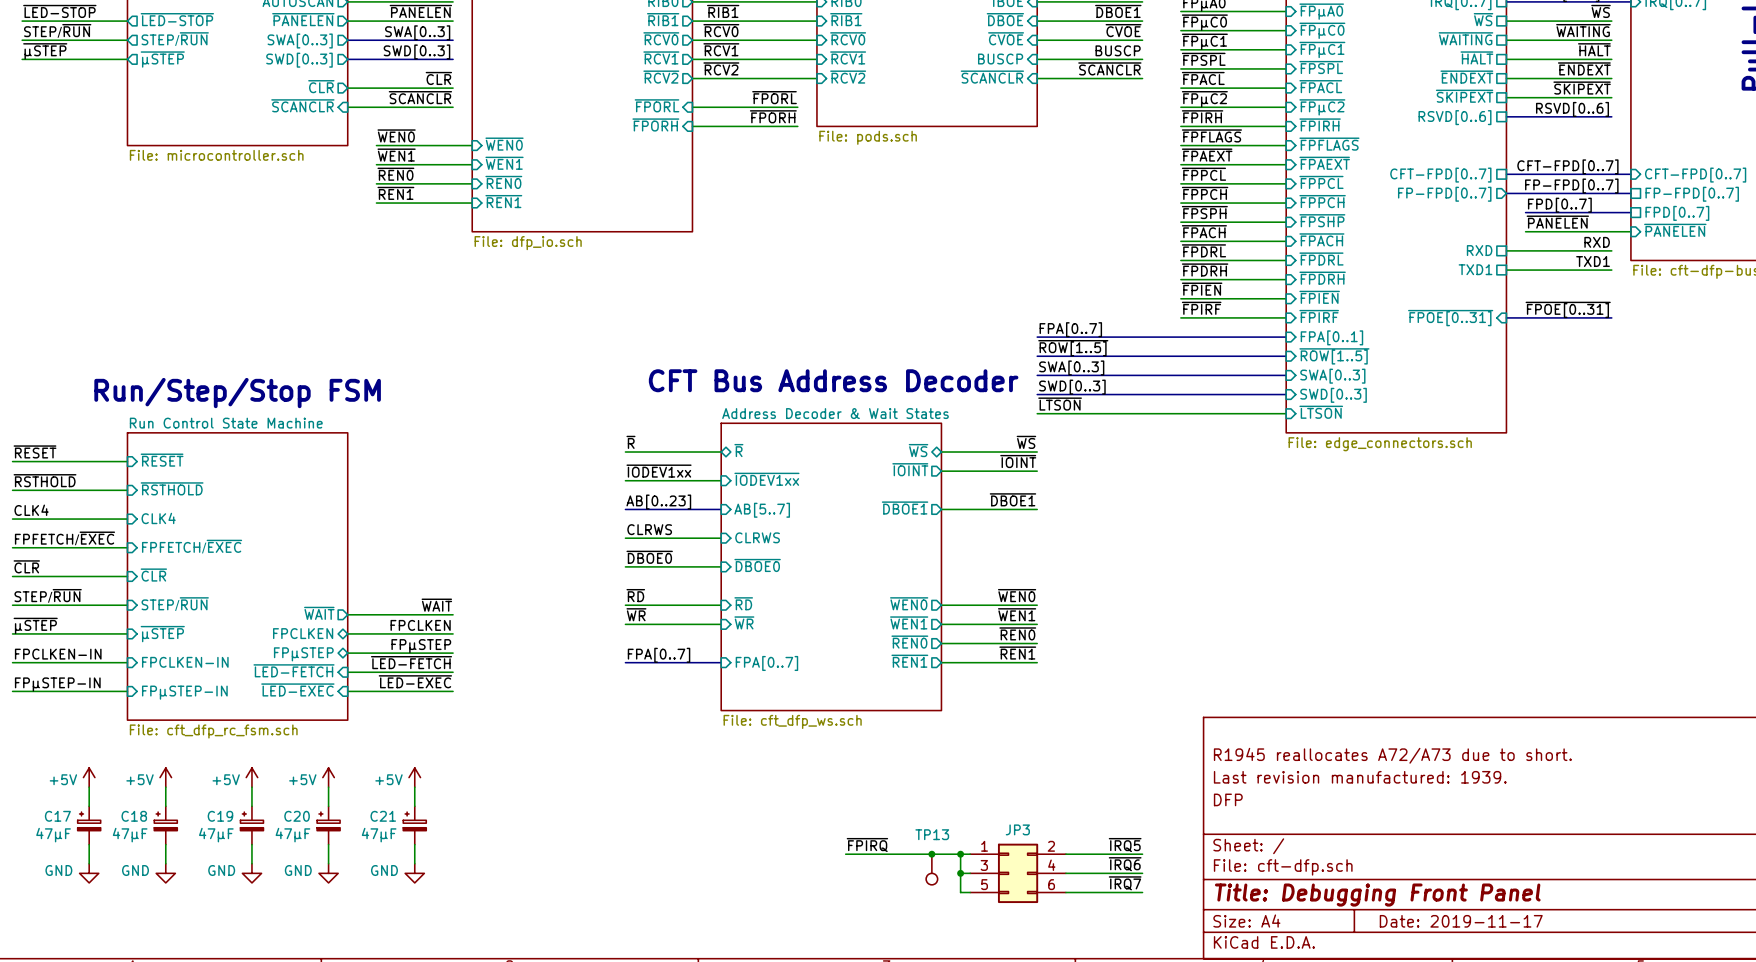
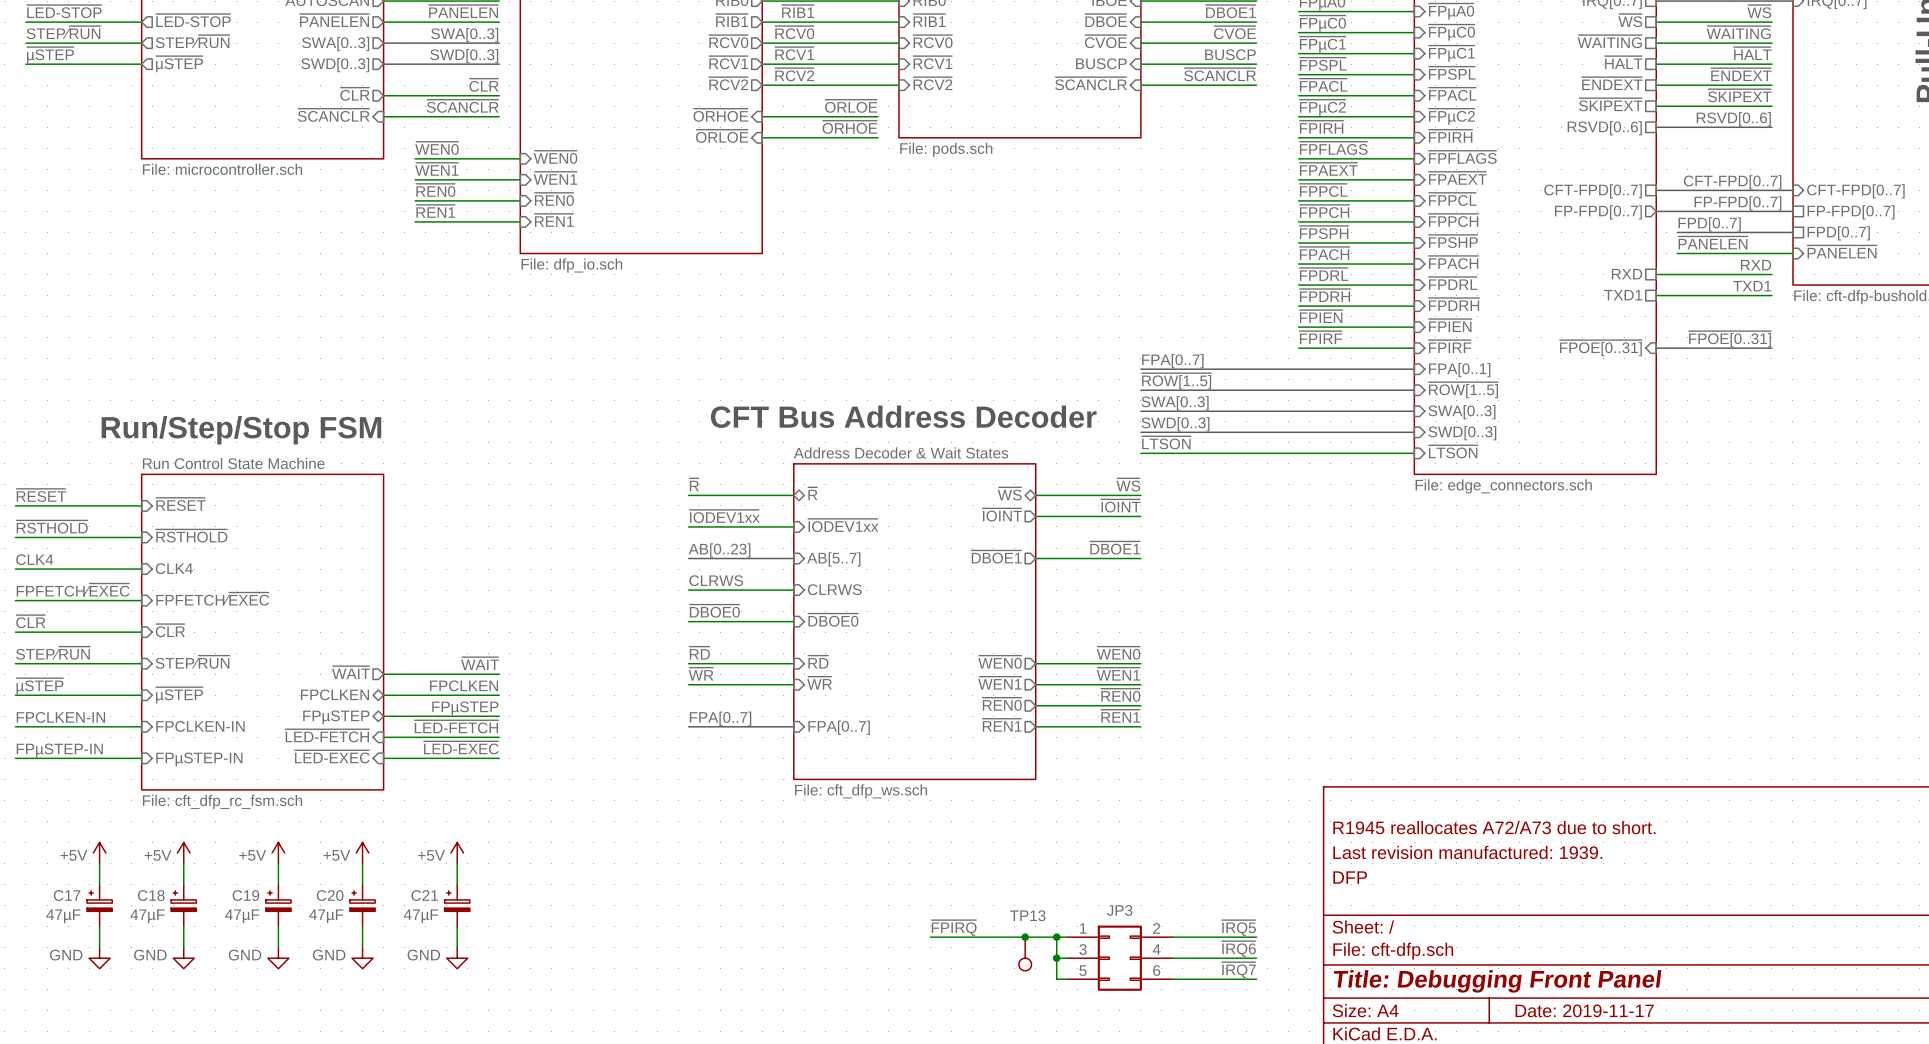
label: ~{FPORL} (774, 97) -> ~{ORLOE} (851, 106)
sheet pin: ~{FPORL} (657, 105) -> ~{ORHOE} (720, 115)
label: ~{FPORH} (773, 116) -> ~{ORHOE} (849, 127)
sheet pin: ~{FPORH} (655, 124) -> ~{ORLOE} (722, 136)

